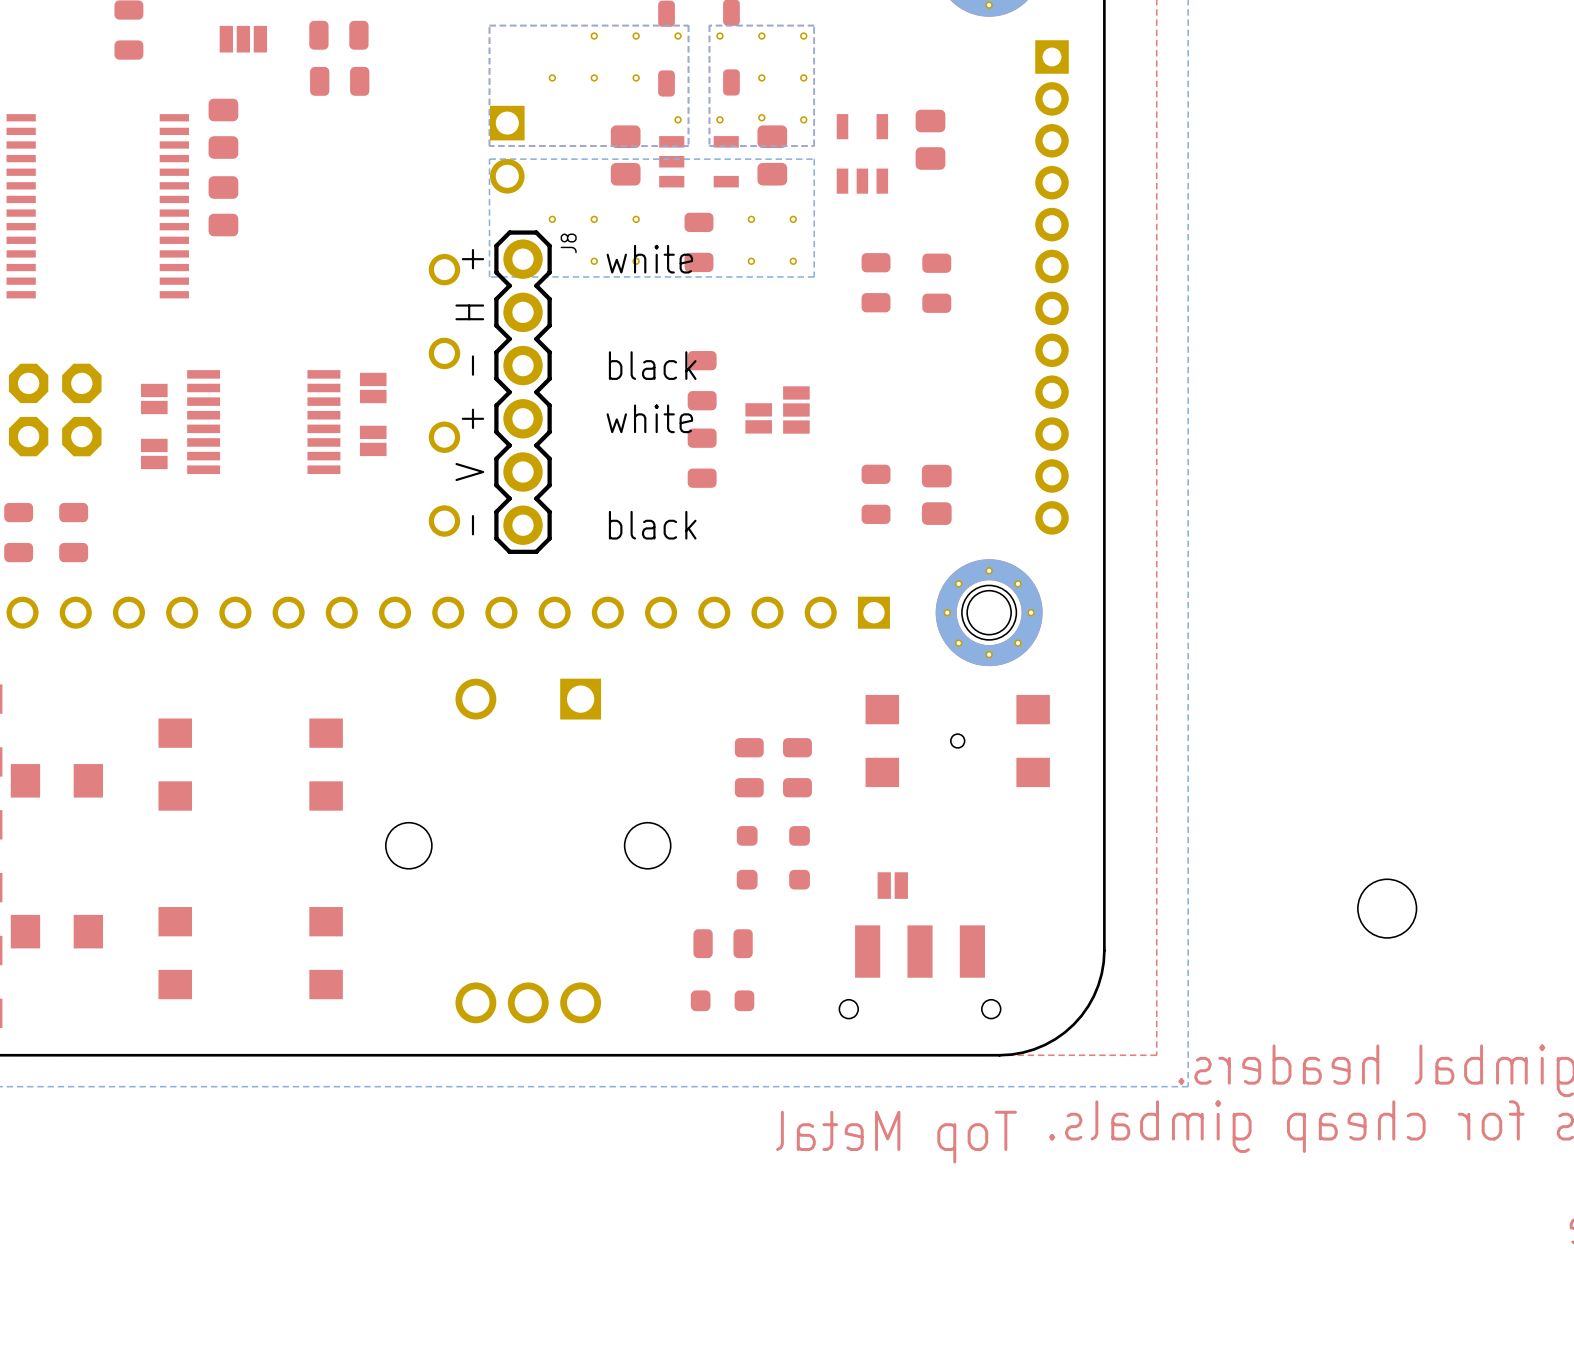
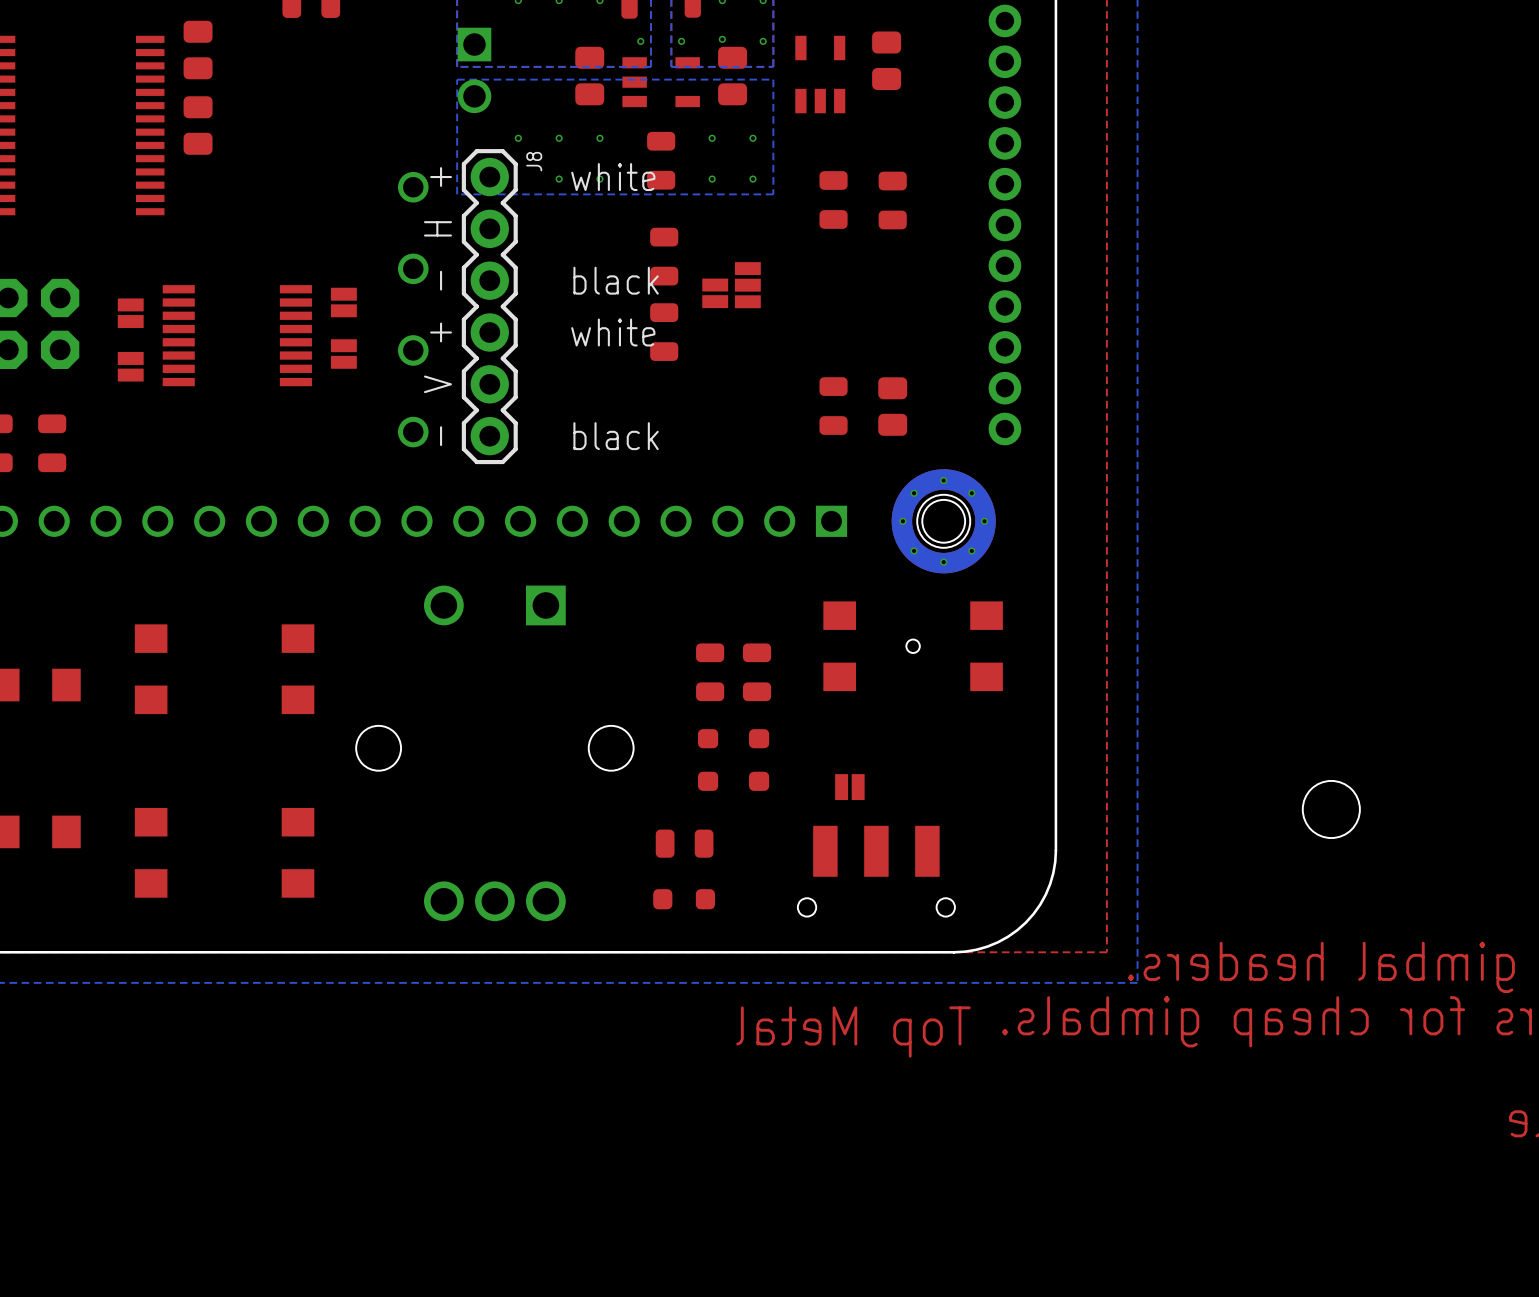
part: none -> (664, 256)
part: (702, 380) -> none
part position: (796, 410) -> (747, 285)
part: none -> (664, 332)
part position: (758, 418) -> (715, 293)
part: (702, 458) -> none

